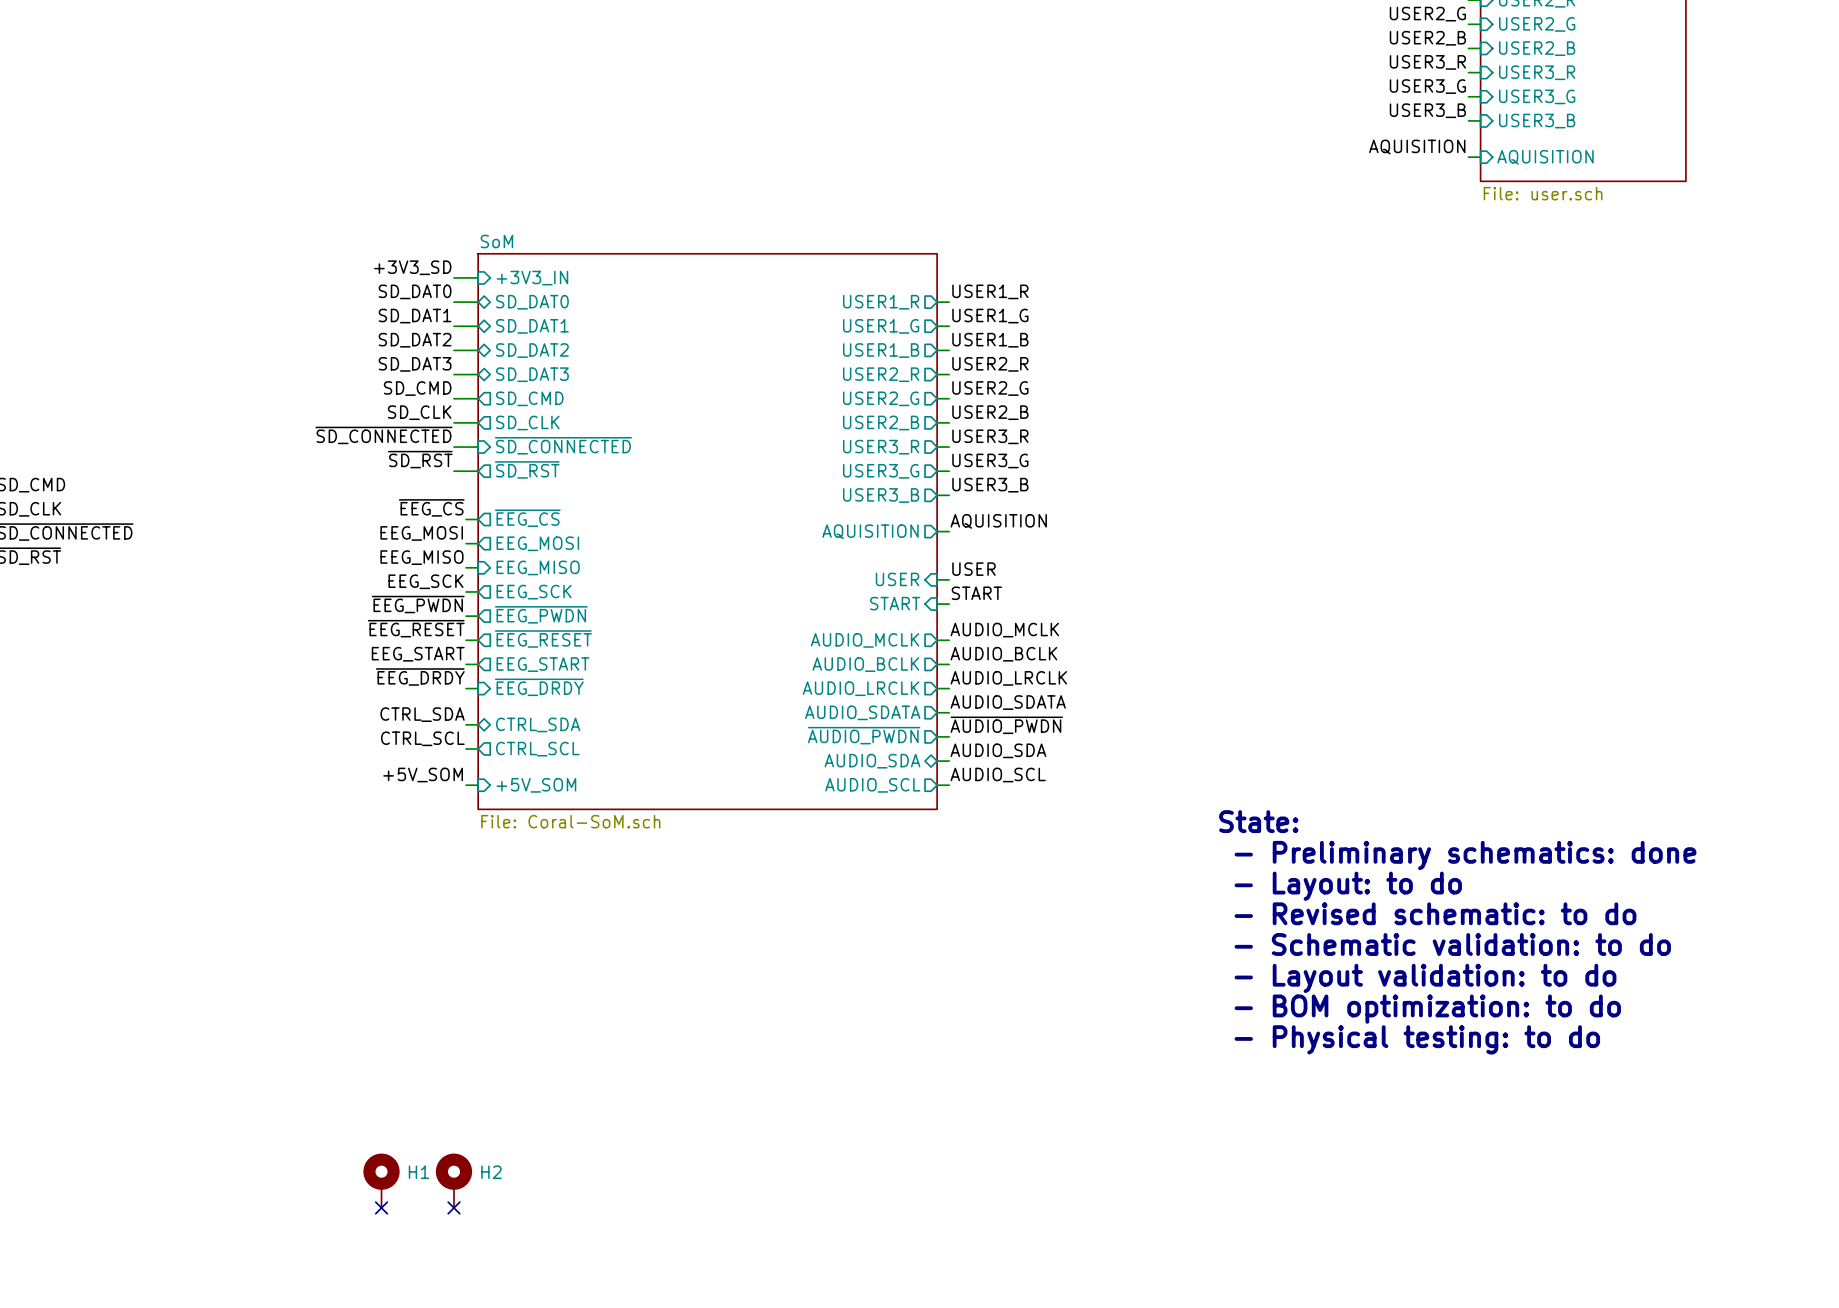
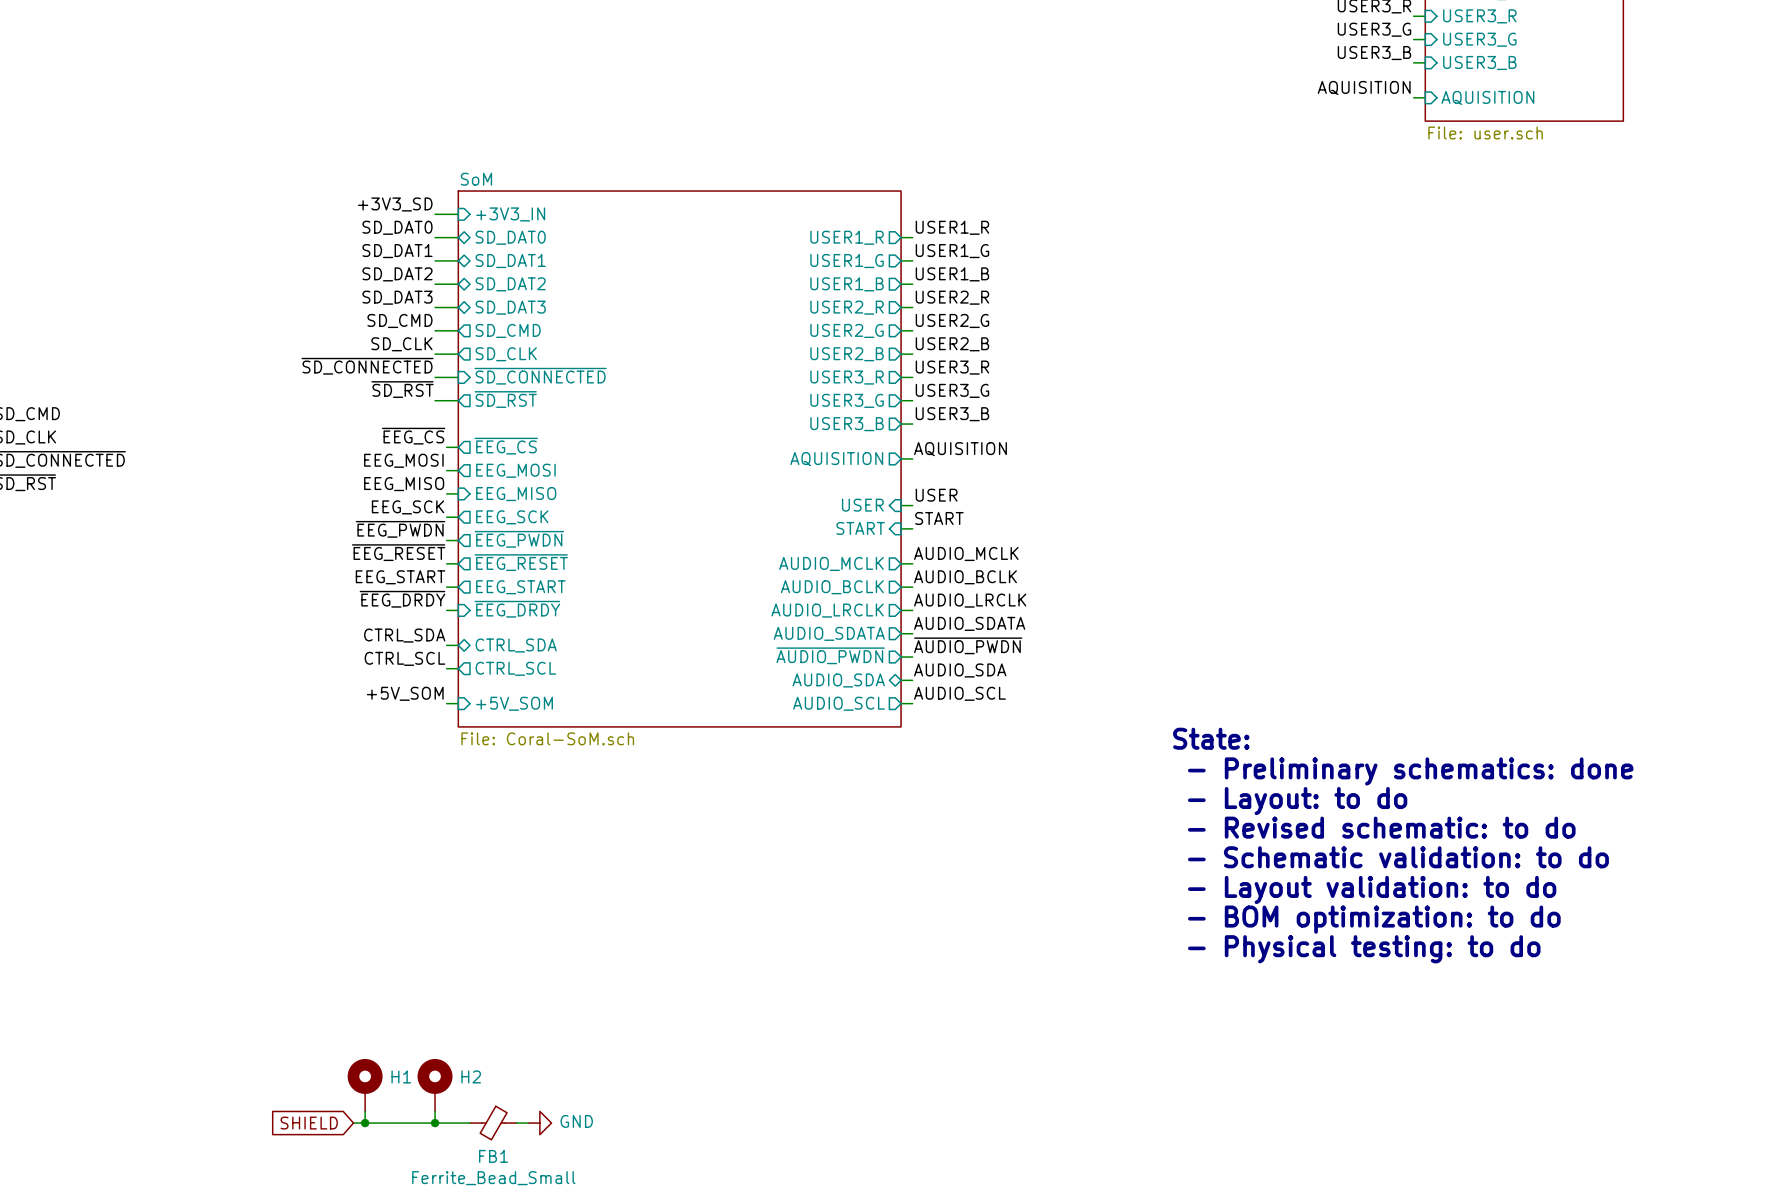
wire: none -> (365, 1111) (365, 1123)
no-connect mark: (381, 1207) -> none
wire: none -> (435, 1111) (435, 1123)
no-connect mark: (453, 1207) -> none
global label: none -> SHIELD (309, 1123)
wire: none -> (353, 1123) (469, 1123)
junction: none -> (365, 1123)
junction: none -> (435, 1123)
FB1: none -> Ferrite_Bead_Small (493, 1123)
wire: none -> (516, 1123) (528, 1123)
power symbol: none -> GND (539, 1123)

